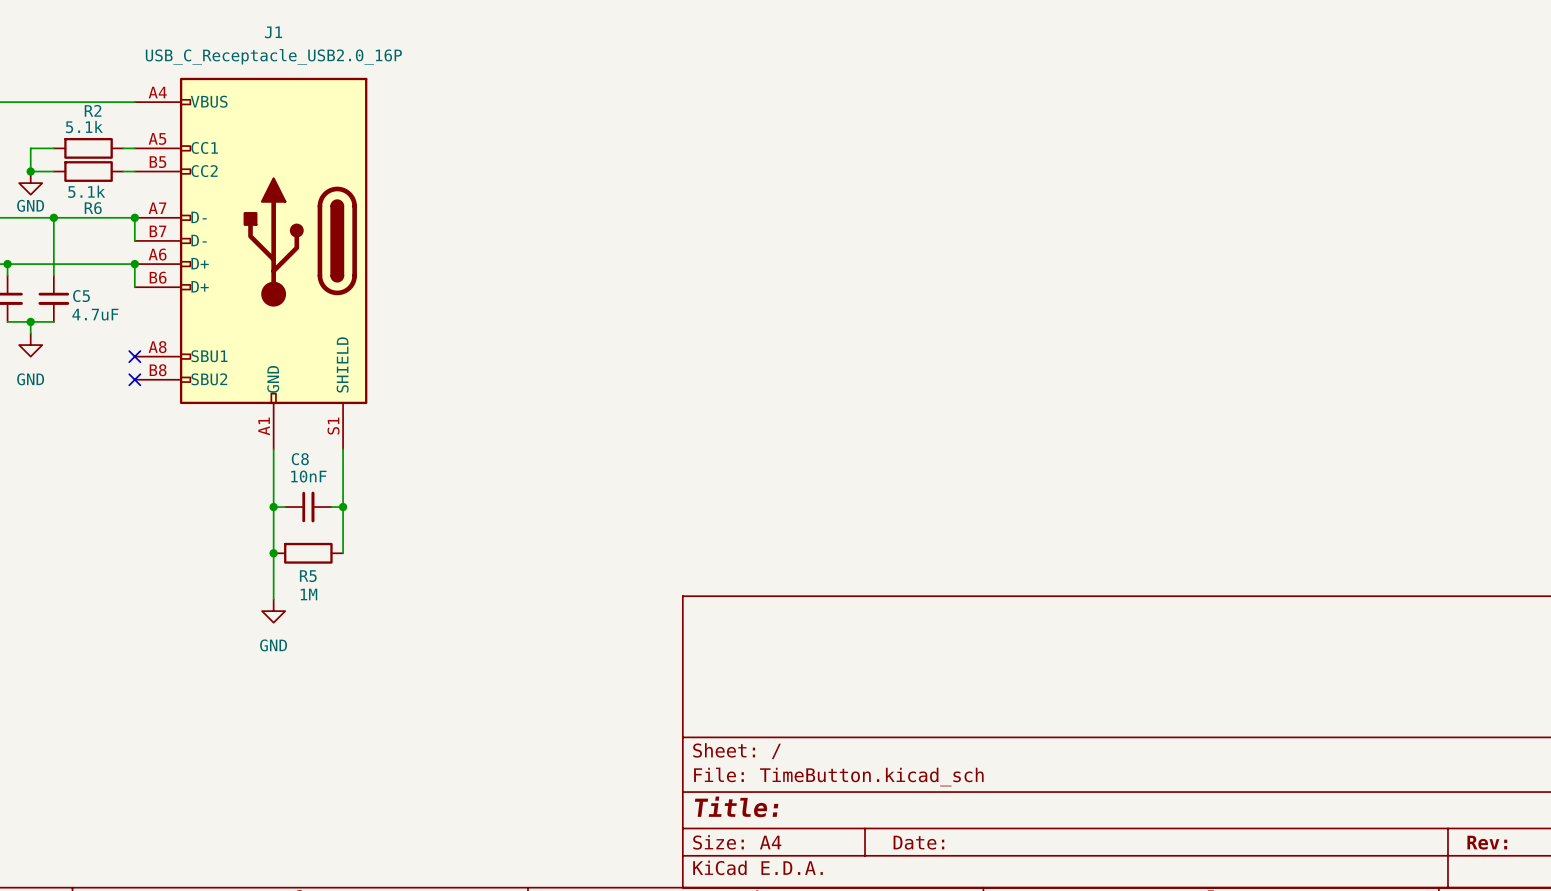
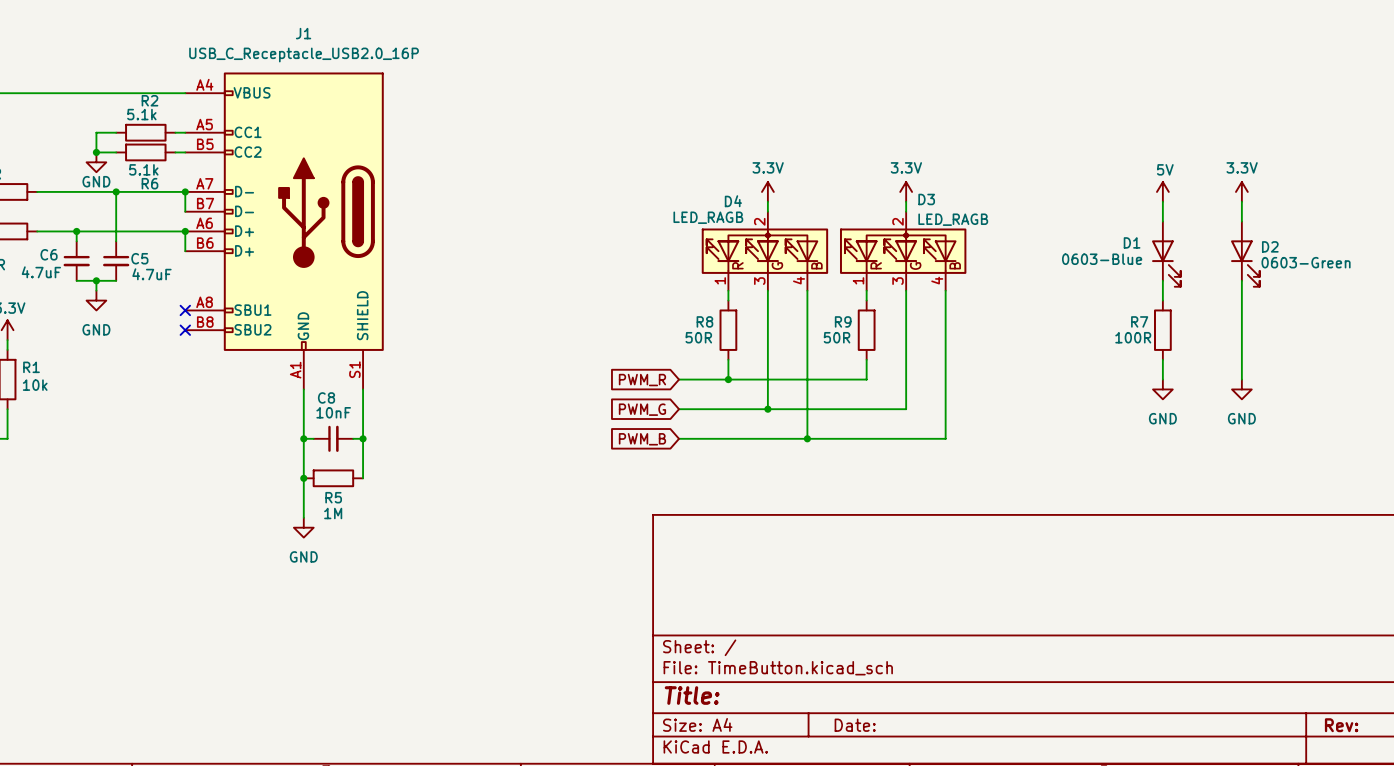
power symbol: none -> 3.3V (767, 191)
power symbol: none -> 3.3V (906, 191)
power symbol: none -> 5V (1162, 191)
power symbol: none -> 3.3V (1241, 191)
wire: none -> (767, 201) (767, 211)
wire: none -> (906, 201) (906, 211)
wire: none -> (1162, 201) (1162, 221)
wire: none -> (1241, 201) (1241, 221)
D4: none -> LED_RAGB (764, 251)
D3: none -> LED_RAGB (903, 251)
D1: none -> 0603-Blue (1166, 254)
D2: none -> 0603-Green (1245, 254)
wire: none -> (1162, 280) (1162, 300)
wire: none -> (1241, 280) (1241, 379)
wire: none -> (728, 290) (728, 300)
wire: none -> (767, 290) (767, 409)
wire: none -> (807, 290) (807, 438)
wire: none -> (866, 290) (866, 300)
wire: none -> (906, 290) (906, 409) (679, 409)
wire: none -> (945, 290) (945, 438) (679, 438)
R8: none -> 50R (728, 330)
R9: none -> 50R (866, 330)
R7: none -> 100R (1162, 330)
wire: none -> (728, 359) (728, 379)
wire: none -> (866, 359) (866, 379) (679, 379)
wire: none -> (1162, 359) (1162, 379)
junction: none -> (728, 379)
global label: none -> PWM_R (642, 380)
power symbol: none -> GND (1162, 389)
power symbol: none -> GND (1241, 389)
junction: none -> (767, 409)
global label: none -> PWM_G (642, 409)
junction: none -> (807, 438)
global label: none -> PWM_B (642, 439)

